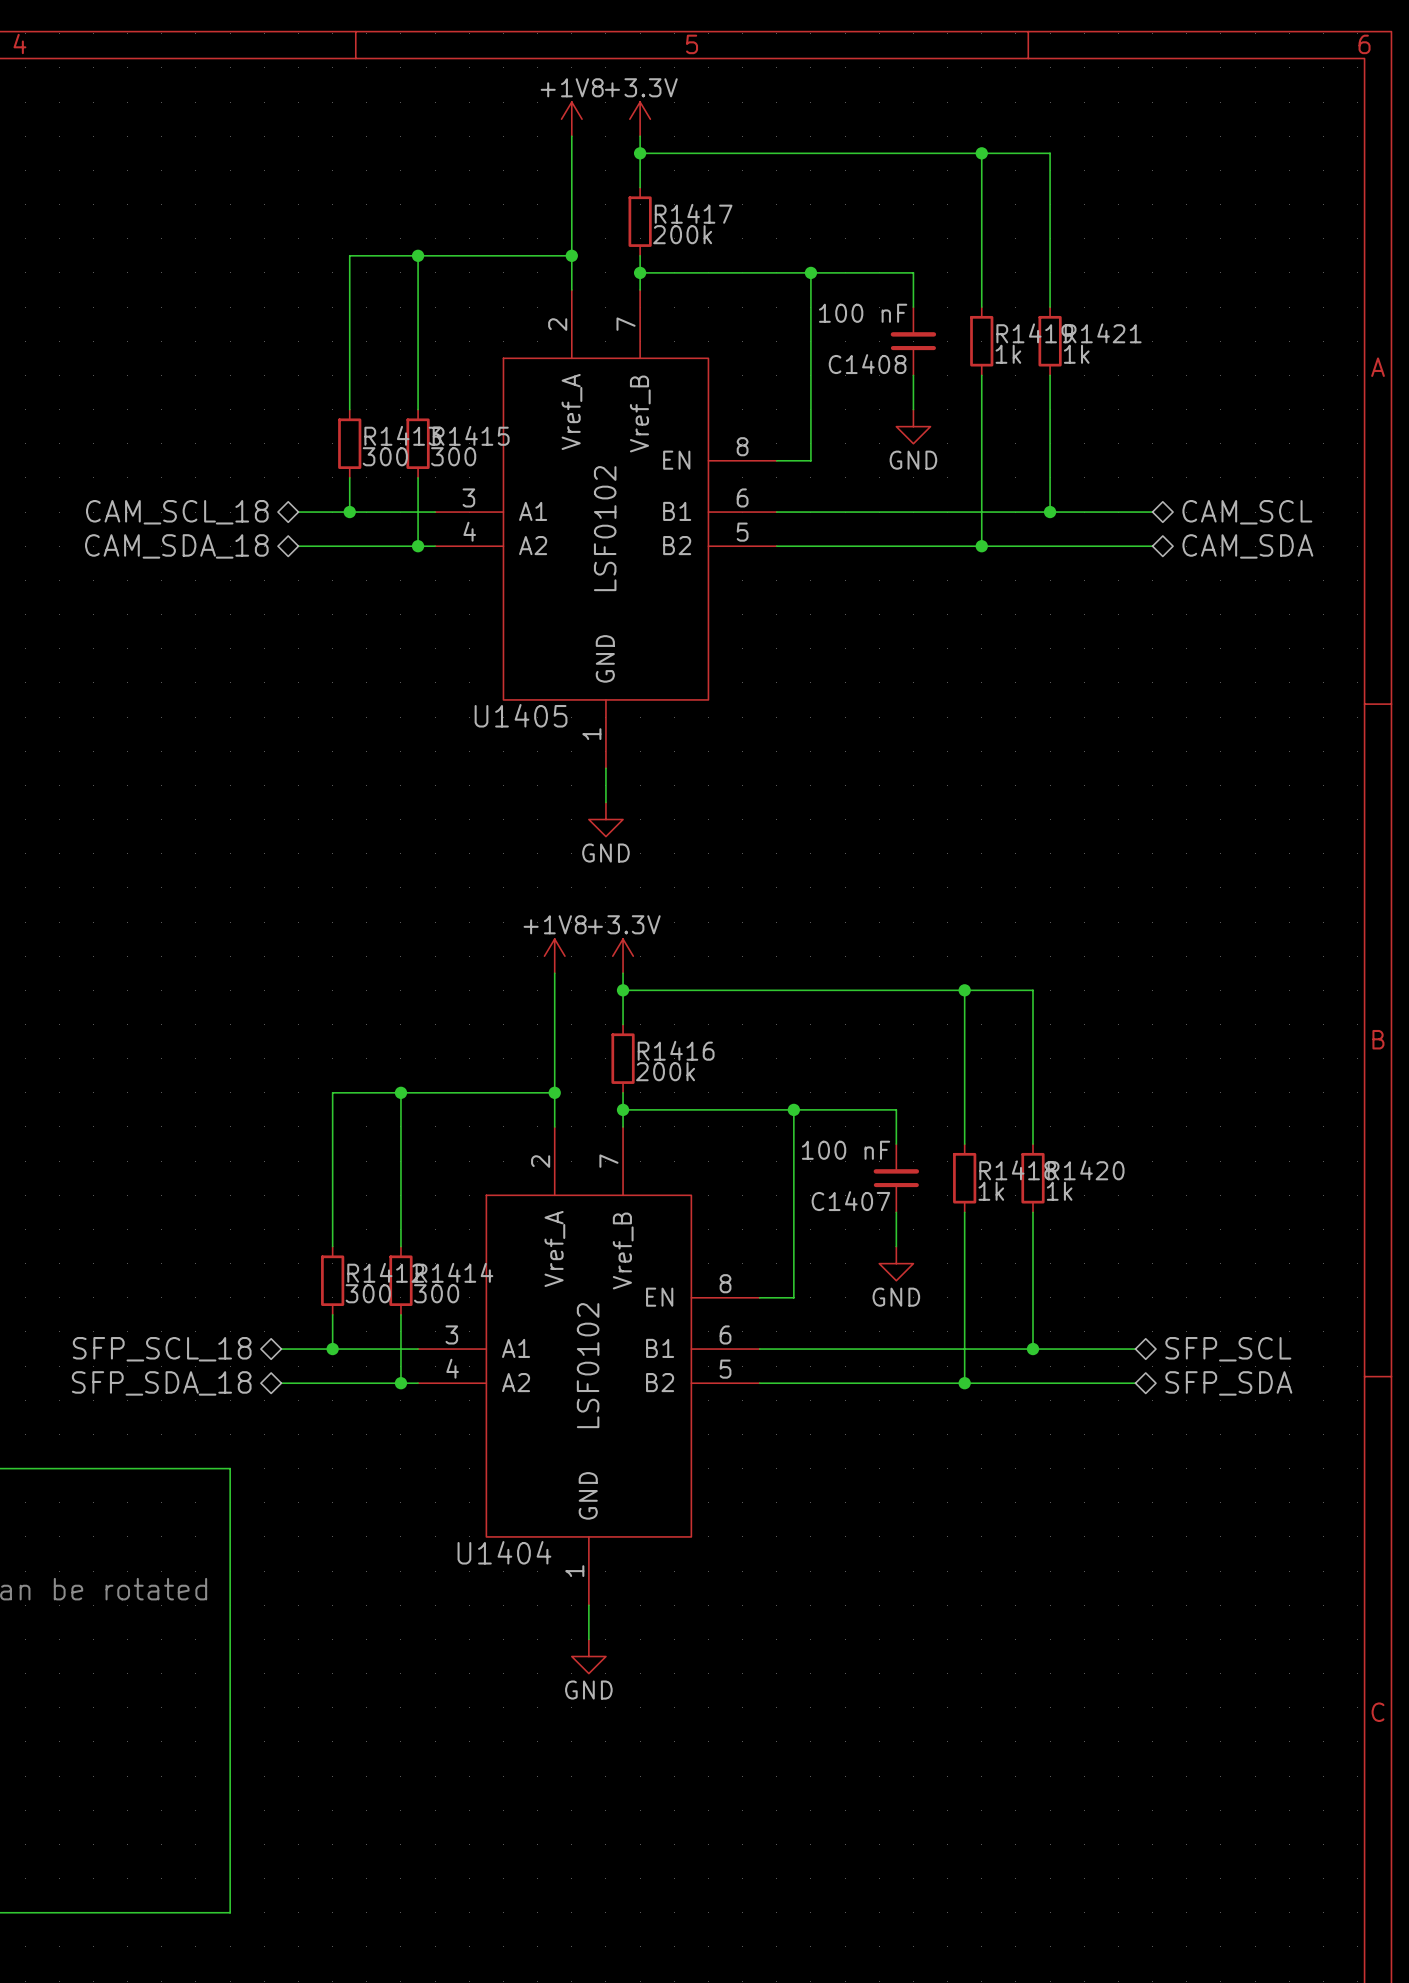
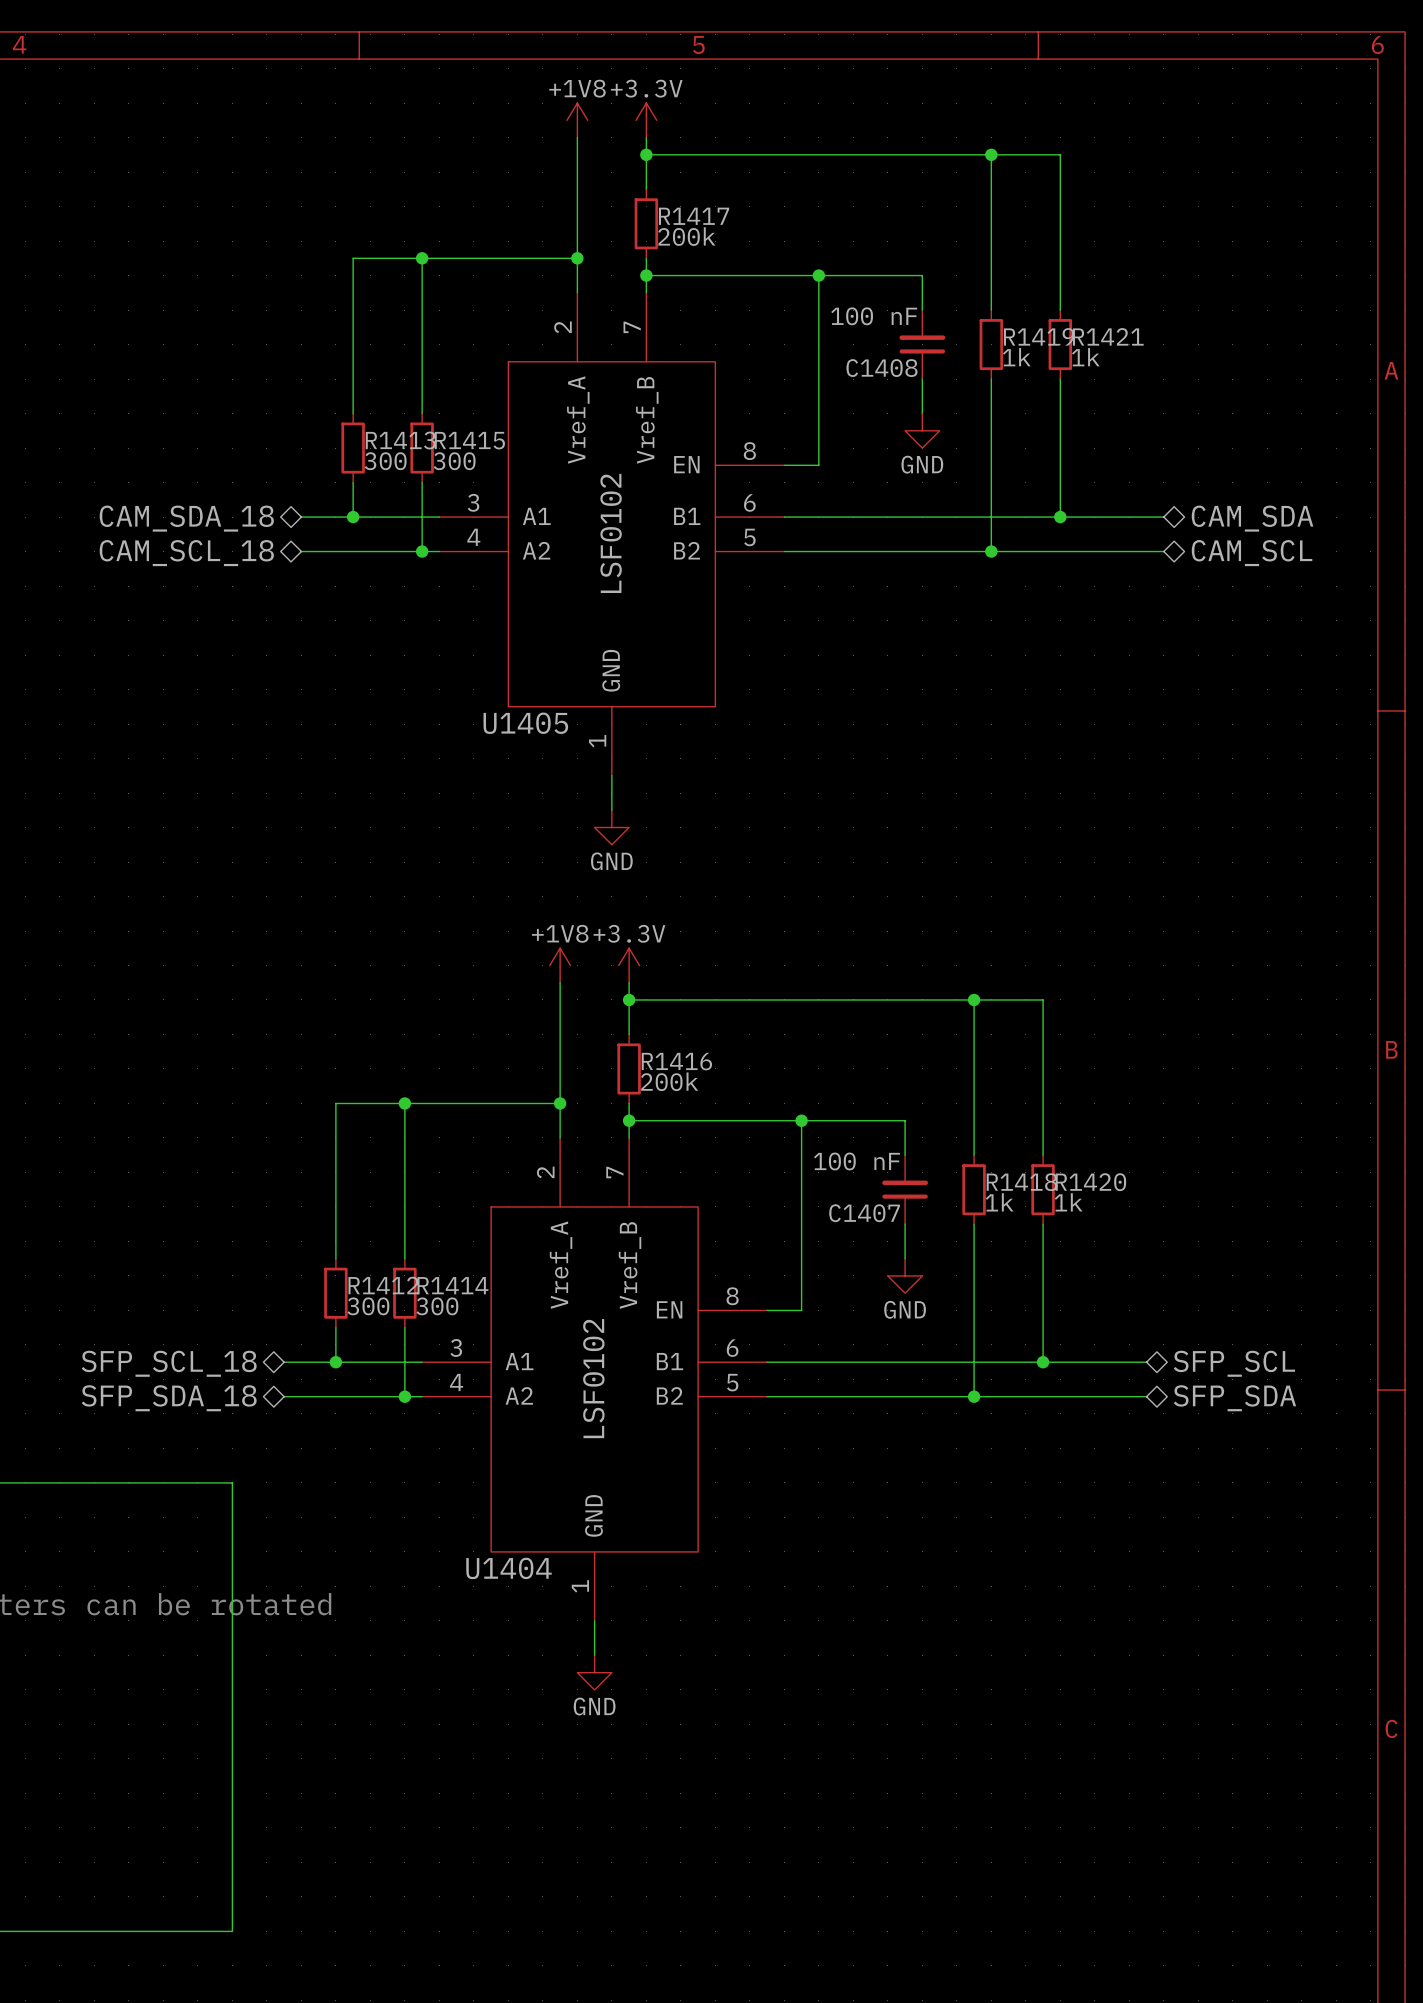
hierarchical label: CAM_SCL_18 (177, 512) -> CAM_SDA_18 (186, 518)
hierarchical label: CAM_SCL (1247, 512) -> CAM_SDA (1252, 518)
hierarchical label: CAM_SDA_18 (176, 546) -> CAM_SCL_18 (186, 553)
hierarchical label: CAM_SDA (1247, 546) -> CAM_SCL (1252, 553)

